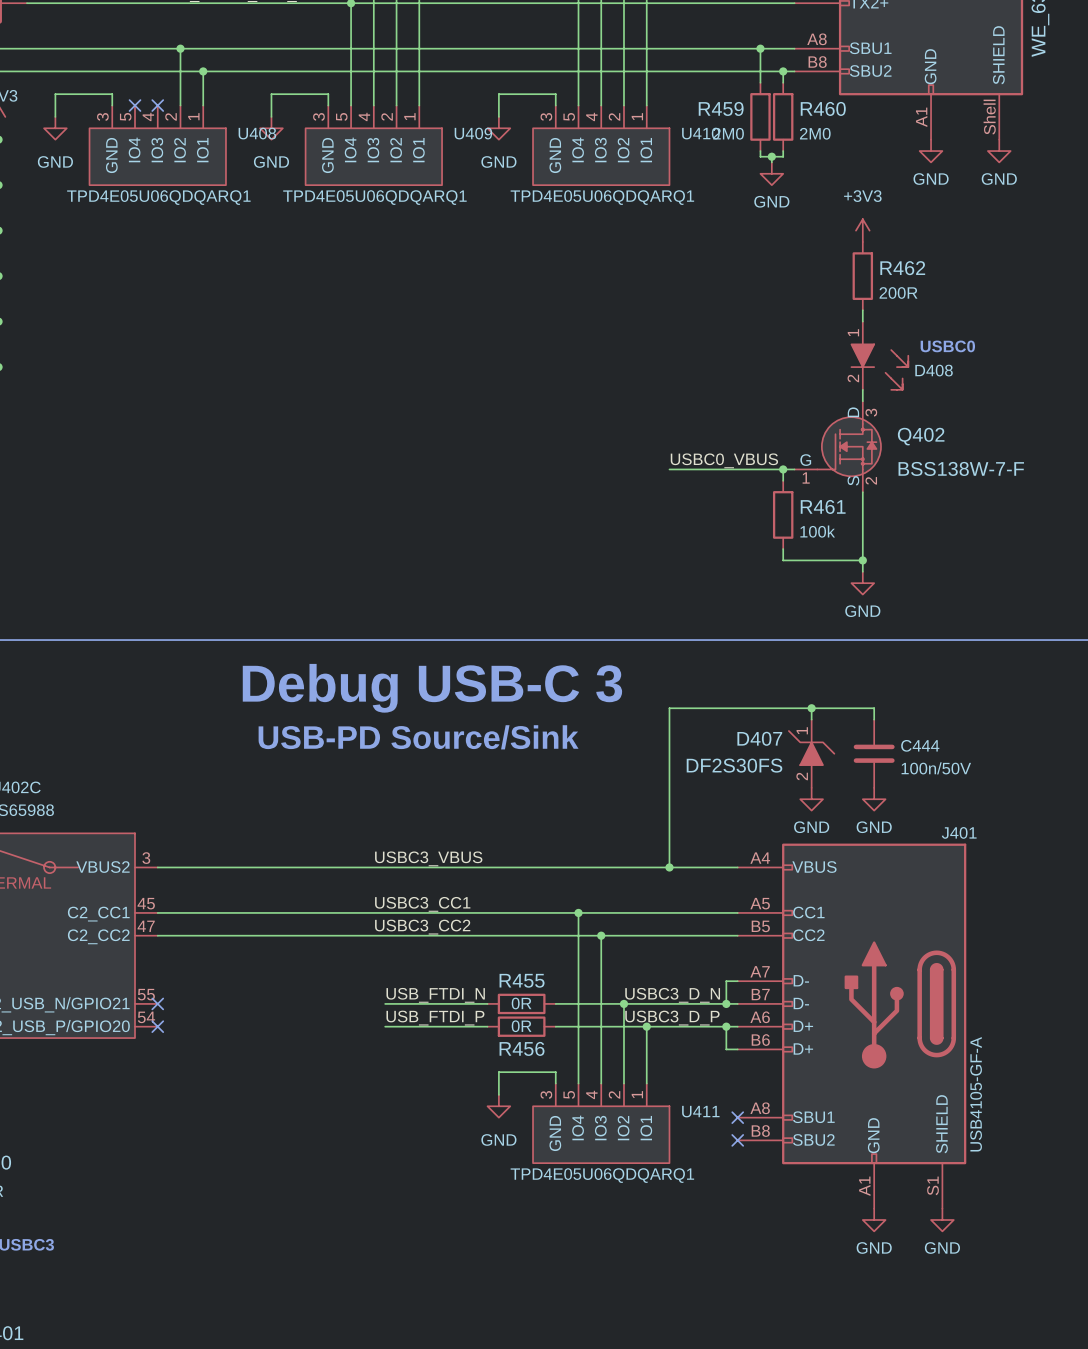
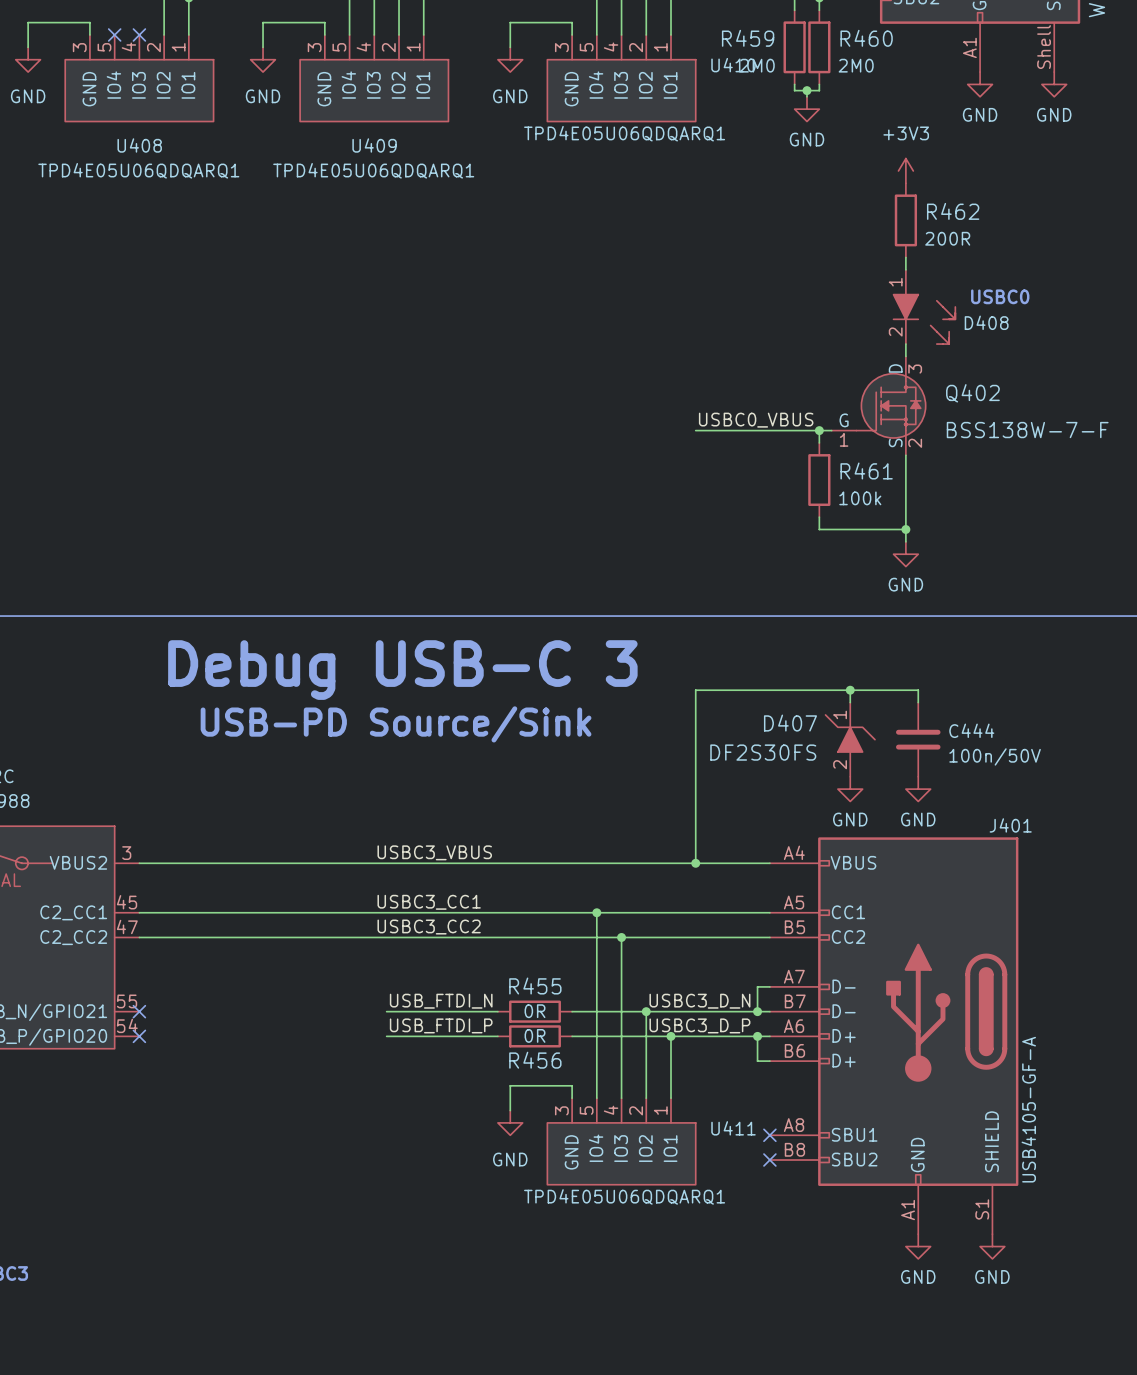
U408 name position: U408 (257, 133) -> U408 (139, 145)
U409 name position: U409 (473, 133) -> U409 (374, 145)
U408 text position: TPD4E05U06QDQARQ1 (158, 197) -> TPD4E05U06QDQARQ1 (138, 170)
U409 text position: TPD4E05U06QDQARQ1 (374, 197) -> TPD4E05U06QDQARQ1 (373, 170)

